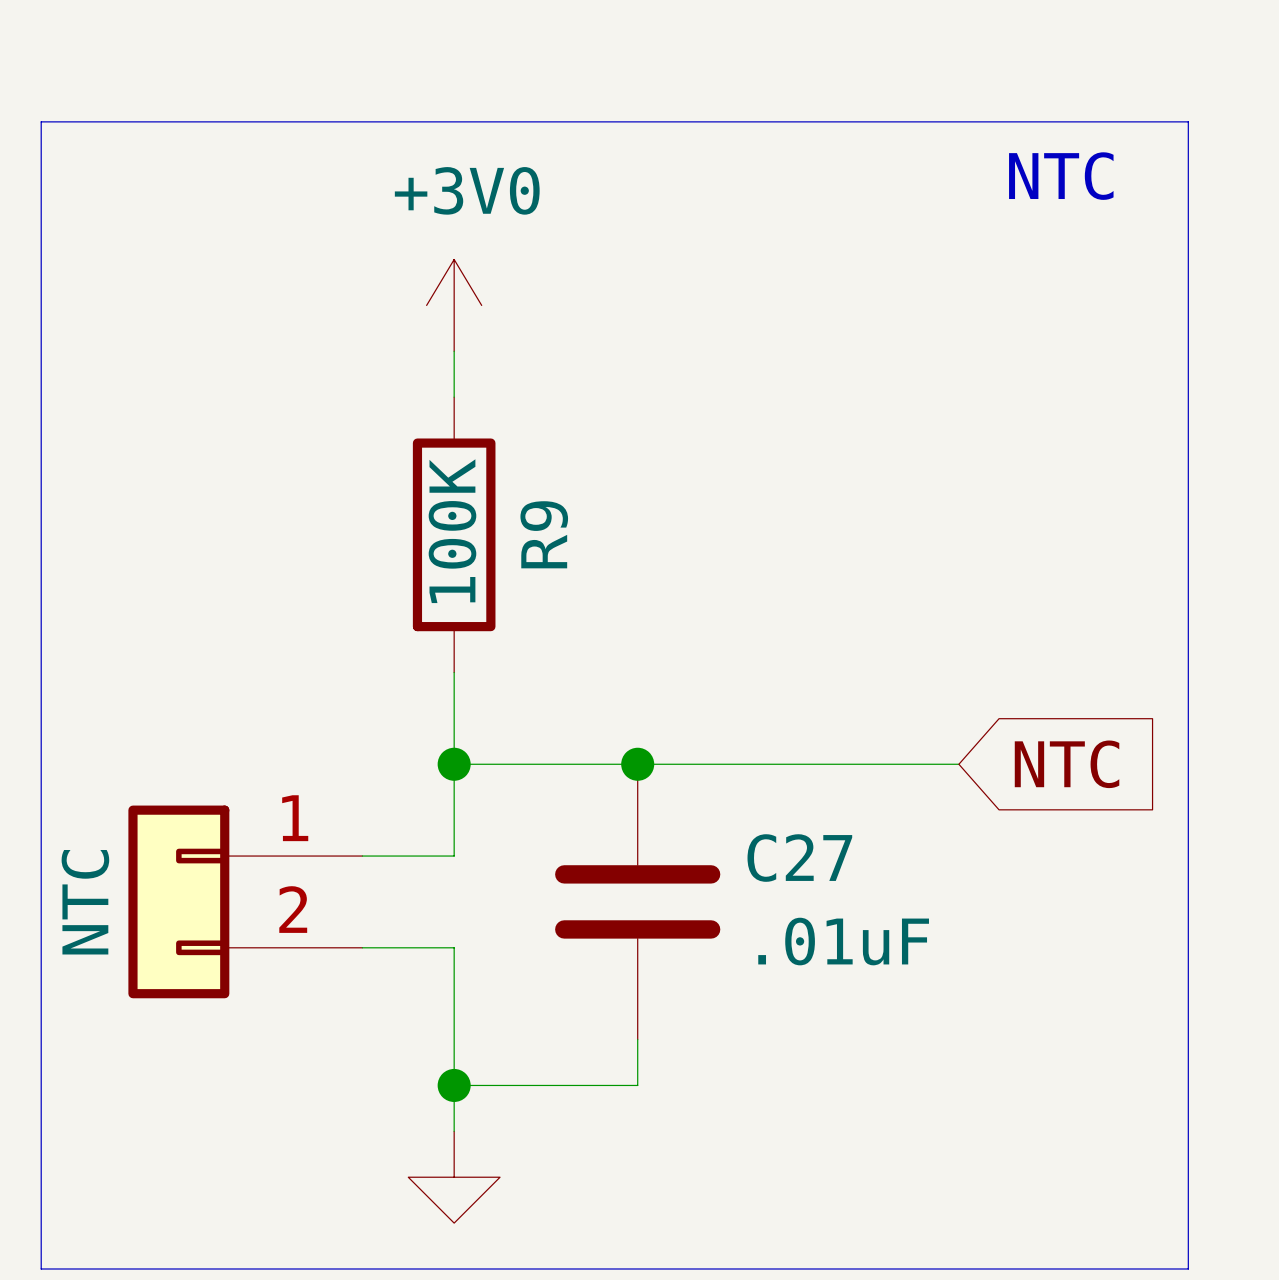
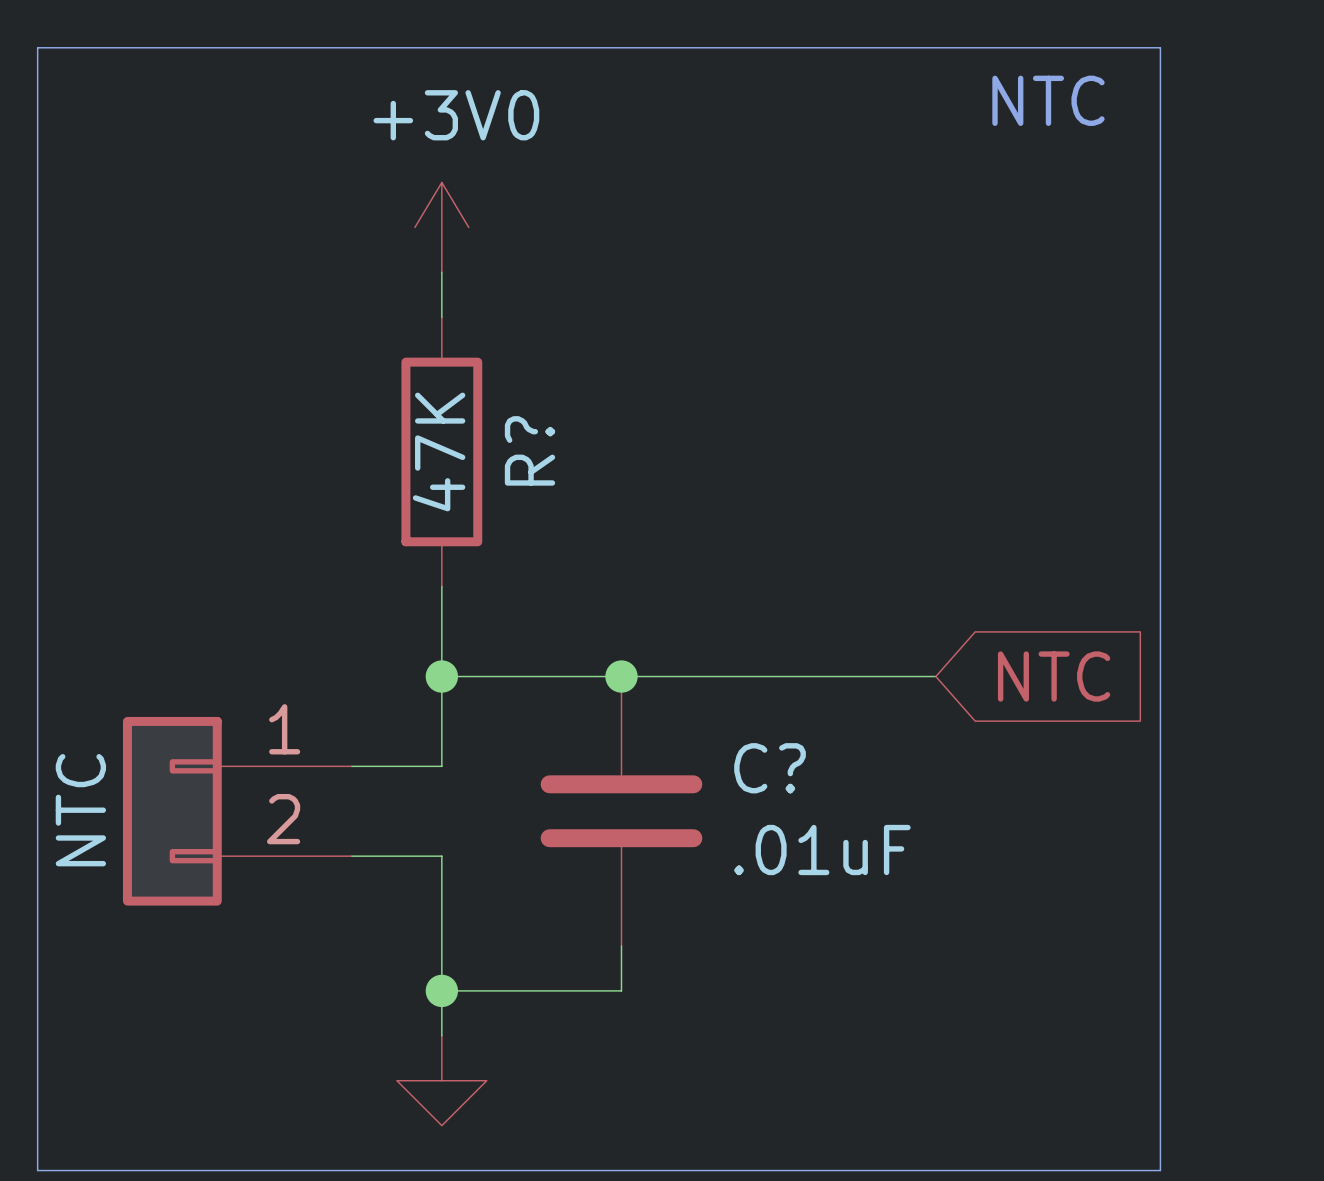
R9 value: 100K (452, 531) -> 47K (439, 451)
R9 name: R9 (544, 534) -> R? (529, 450)
C27 name: C27 (799, 858) -> C? (770, 768)

